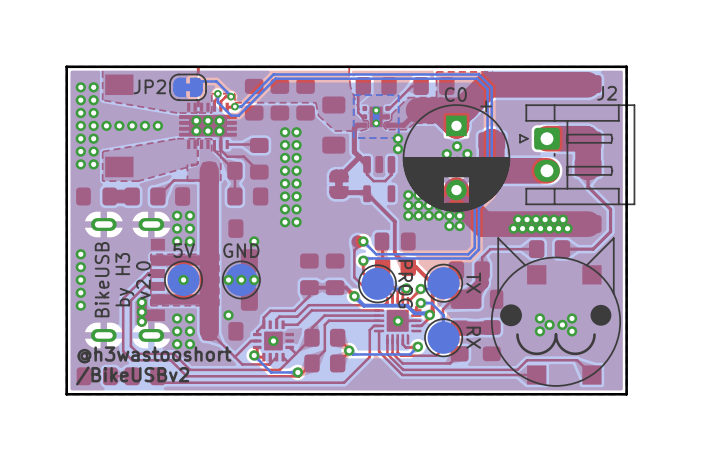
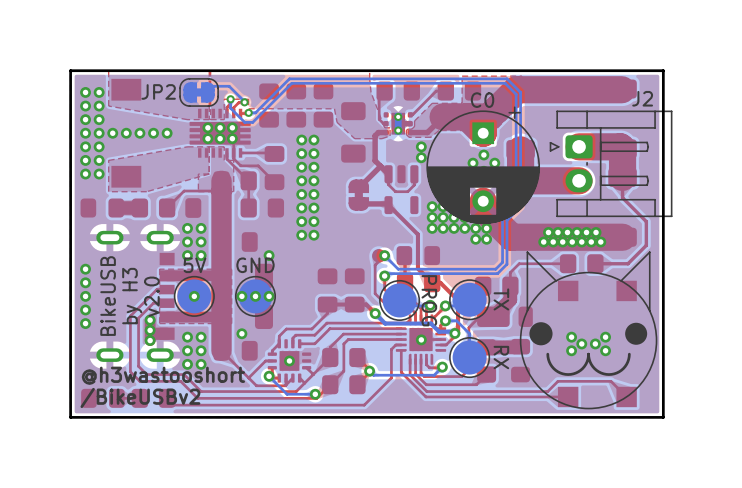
bottom zone outline: (398, 95) (353, 95) (353, 138) (398, 138) (398, 95) -> none

